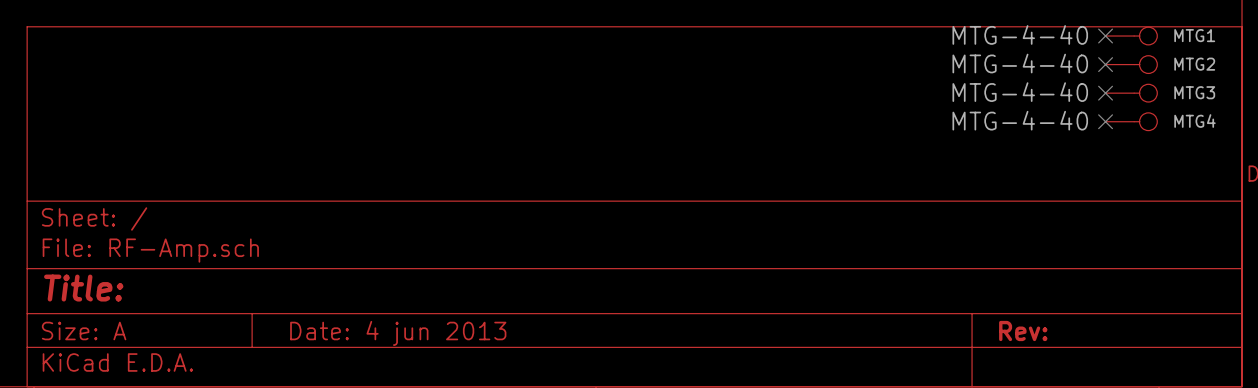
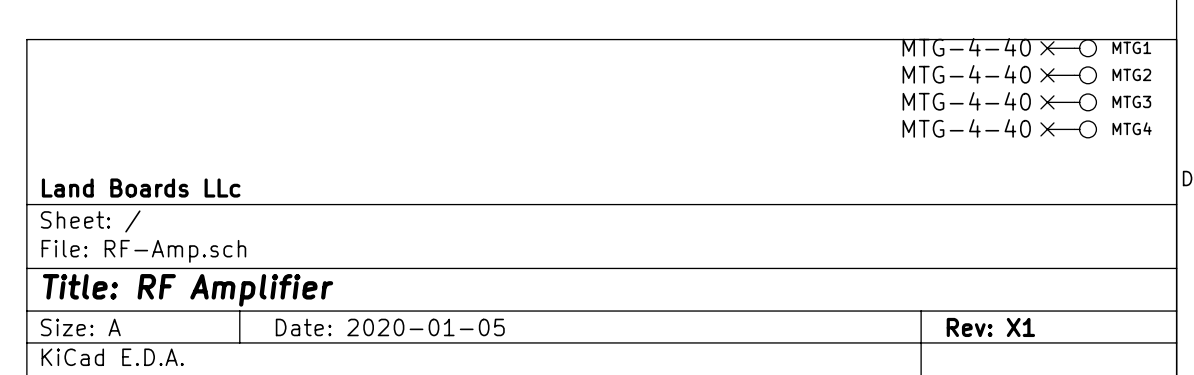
title block: none -> Land Boards LLc (141, 188)
title block: Title: (83, 288) -> Title: RF Amplifier (188, 290)
title block: Rev: (1023, 331) -> Rev: X1 (990, 327)
title block: Date: 4 jun 2013 (398, 333) -> Date: 2020-01-05 (390, 327)

